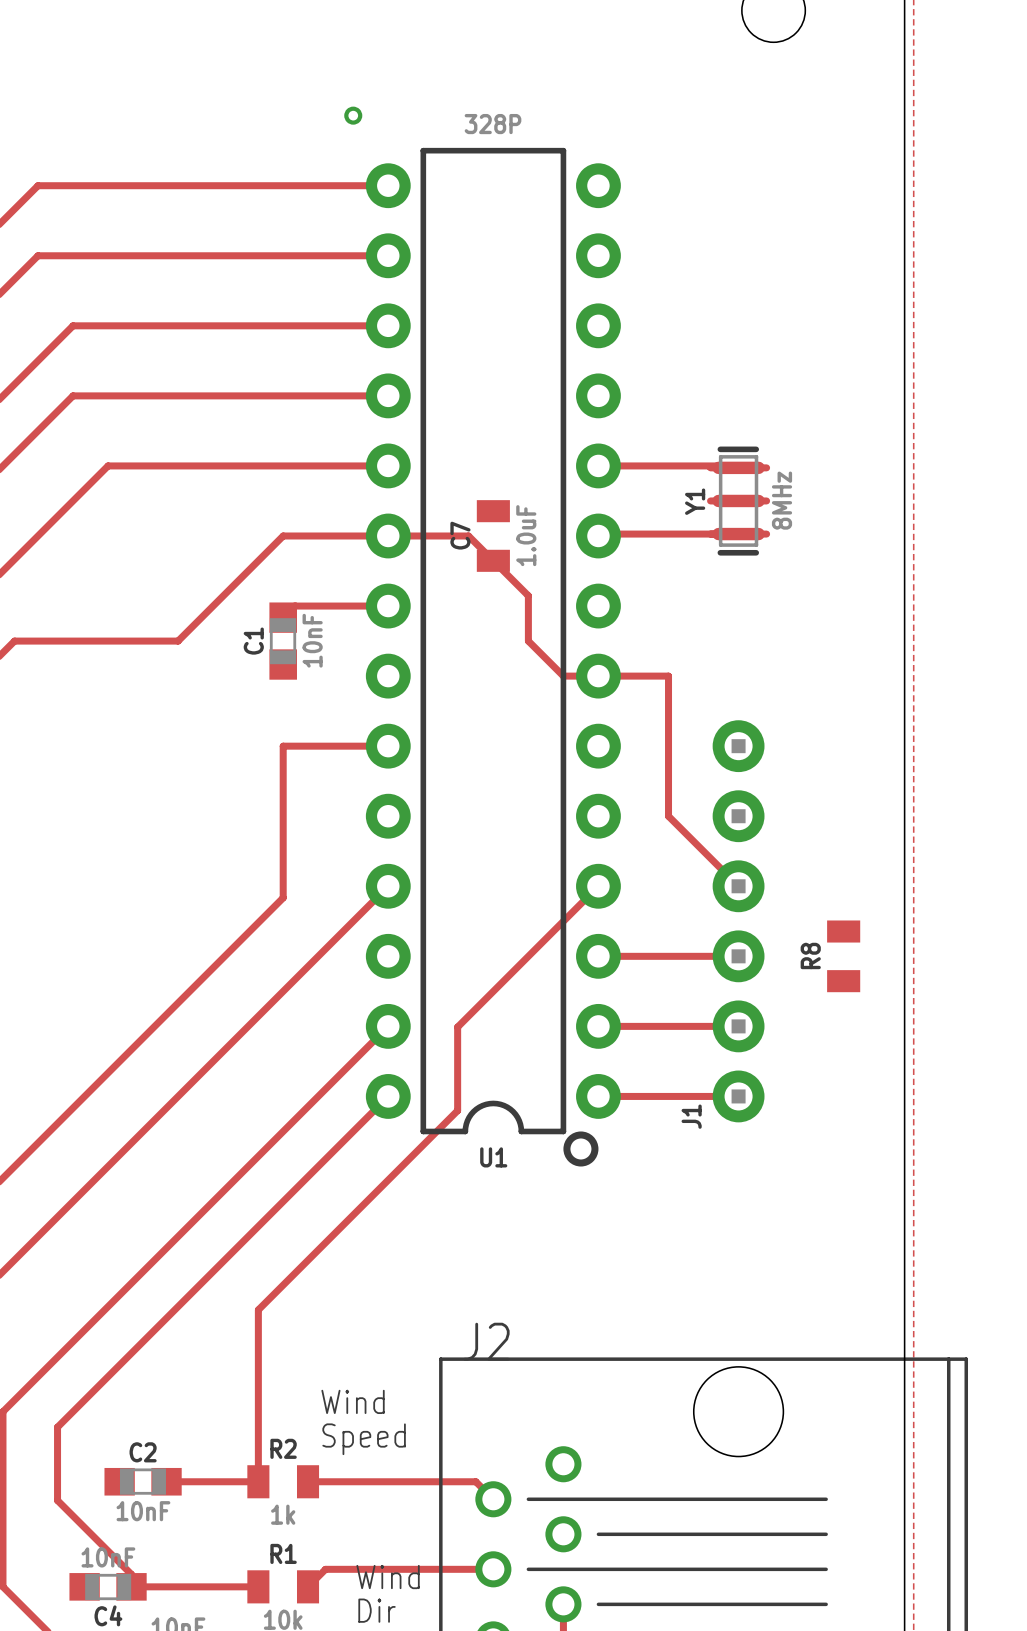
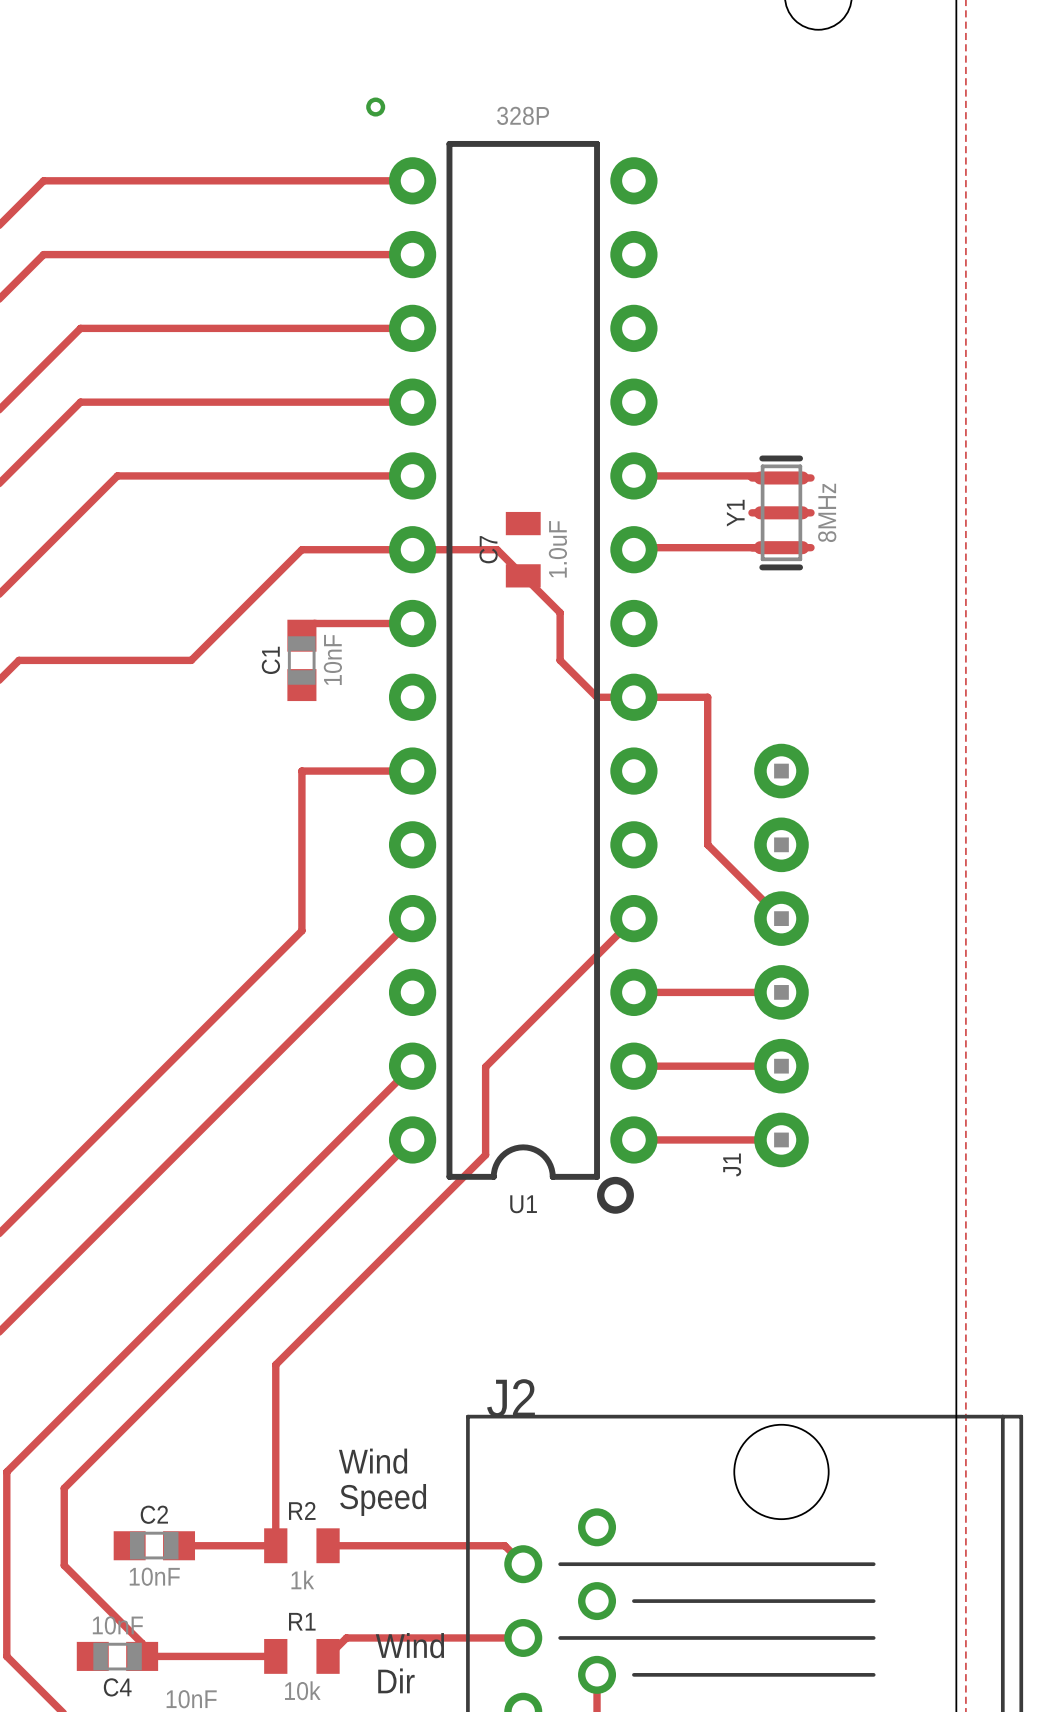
R8: (843, 956) -> none

